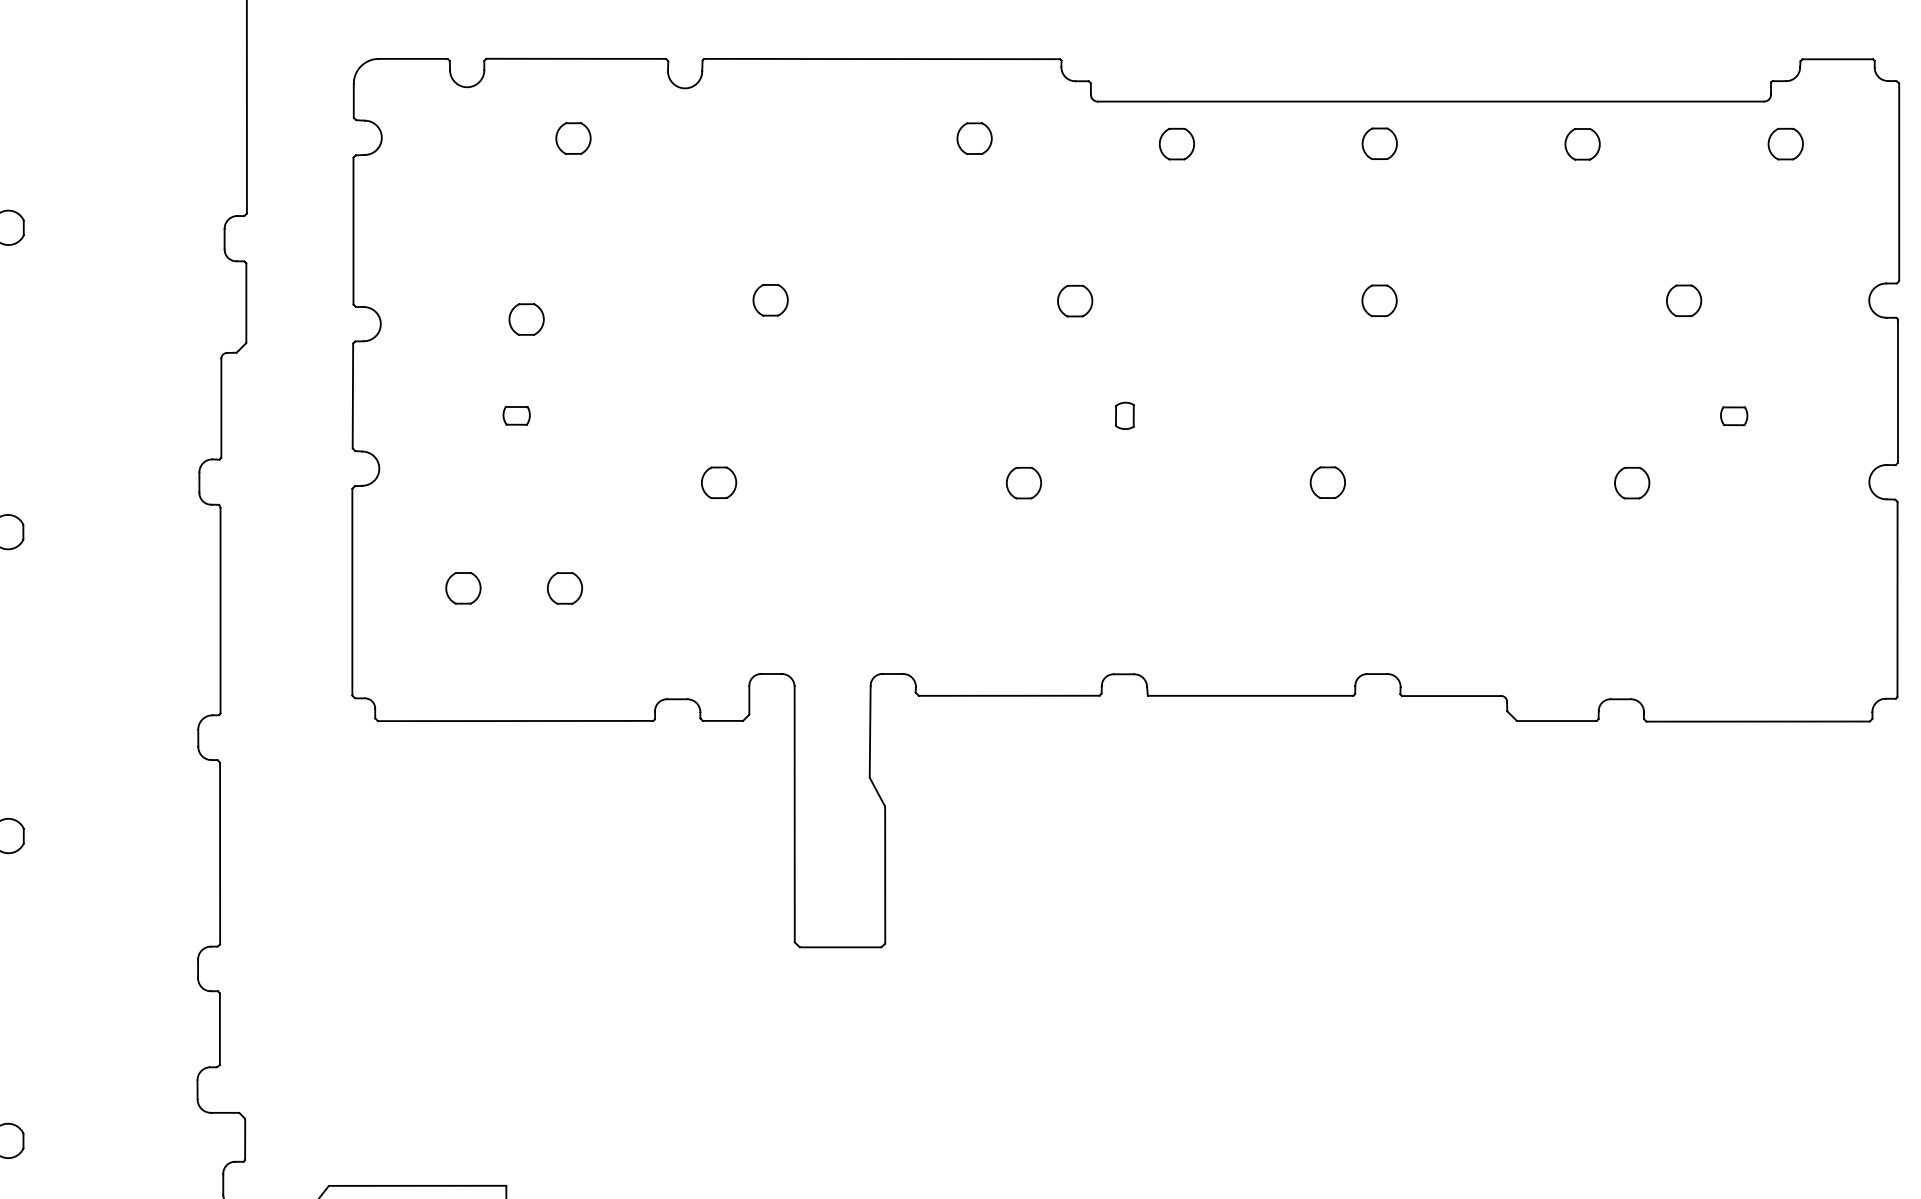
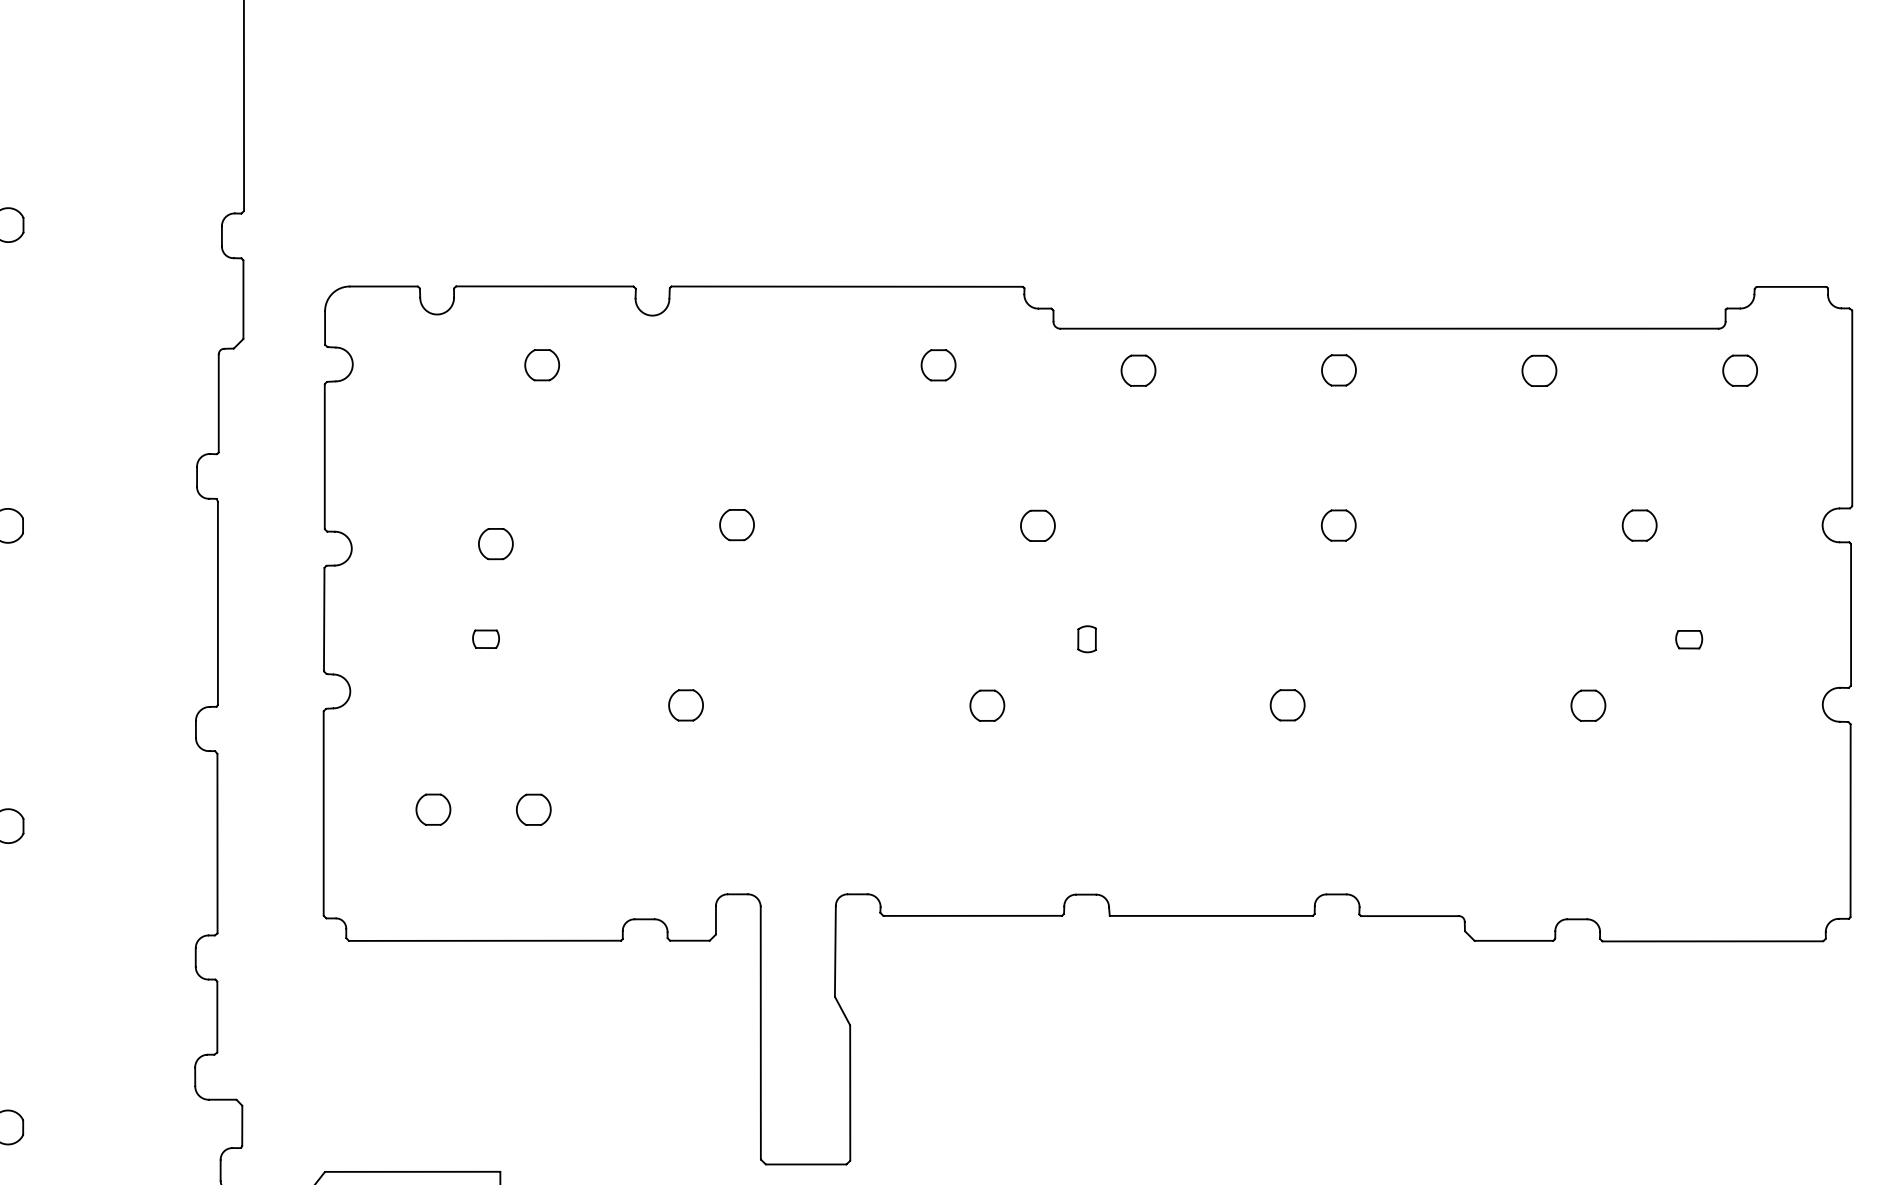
board edge: (566, 123) (581, 123) (588, 130) (590, 142) (587, 148) (580, 153) (565, 153) (558, 146) (556, 134) (559, 128) (566, 123) -> (534, 350) (549, 350) (557, 357) (558, 369) (555, 375) (549, 380) (534, 380) (527, 373) (525, 365) (526, 359) (534, 350)
board edge: (967, 123) (982, 123) (989, 130) (991, 138) (990, 144) (982, 153) (967, 153) (959, 146) (957, 134) (960, 128) (967, 123) -> (931, 350) (946, 350) (953, 357) (955, 369) (952, 375) (945, 380) (931, 380) (923, 373) (921, 365) (922, 359) (931, 350)
board edge: (1169, 128) (1184, 128) (1192, 136) (1193, 148) (1190, 154) (1184, 159) (1169, 159) (1161, 152) (1160, 139) (1163, 134) (1169, 128) -> (1131, 355) (1146, 355) (1153, 362) (1155, 368) (1154, 376) (1145, 385) (1131, 385) (1123, 378) (1122, 366) (1124, 360) (1131, 355)
board edge: (1372, 128) (1387, 128) (1394, 135) (1396, 148) (1393, 153) (1387, 159) (1372, 159) (1364, 151) (1362, 145) (1363, 137) (1372, 128) -> (1331, 355) (1346, 355) (1353, 362) (1355, 374) (1352, 380) (1346, 385) (1331, 385) (1324, 378) (1322, 366) (1325, 360) (1331, 355)
board edge: (1778, 128) (1793, 128) (1800, 136) (1802, 144) (1801, 150) (1793, 159) (1778, 159) (1770, 152) (1769, 139) (1771, 134) (1778, 128) -> (1732, 355) (1747, 355) (1755, 362) (1757, 370) (1755, 376) (1747, 385) (1732, 385) (1725, 378) (1723, 366) (1726, 360) (1732, 355)
board edge: (1575, 129) (1590, 128) (1597, 136) (1599, 142) (1598, 150) (1590, 159) (1575, 159) (1567, 152) (1565, 146) (1566, 138) (1575, 129) -> (1532, 355) (1546, 355) (1554, 362) (1556, 368) (1555, 377) (1546, 386) (1531, 386) (1524, 378) (1522, 370) (1523, 364) (1532, 355)
board edge: (763, 285) (778, 284) (785, 292) (787, 298) (786, 306) (778, 315) (763, 315) (755, 308) (753, 302) (754, 294) (763, 285) -> (729, 509) (744, 509) (752, 517) (753, 529) (750, 534) (744, 540) (729, 540) (722, 533) (720, 525) (721, 518) (729, 509)
board edge: (1067, 285) (1082, 285) (1090, 293) (1091, 305) (1089, 311) (1082, 316) (1067, 316) (1060, 309) (1058, 303) (1059, 294) (1067, 285) -> (1030, 510) (1045, 510) (1052, 517) (1054, 530) (1051, 535) (1045, 541) (1030, 541) (1022, 533) (1020, 525) (1022, 519) (1030, 510)
board edge: (1372, 285) (1387, 285) (1394, 292) (1396, 305) (1393, 310) (1386, 316) (1372, 316) (1364, 308) (1362, 296) (1365, 290) (1372, 285) -> (1331, 510) (1346, 510) (1353, 517) (1355, 525) (1354, 531) (1346, 540) (1331, 540) (1323, 533) (1322, 521) (1325, 515) (1331, 510)
board edge: (1676, 285) (1691, 285) (1699, 292) (1701, 300) (1700, 307) (1691, 316) (1676, 316) (1668, 308) (1666, 300) (1668, 294) (1676, 285) -> (1632, 510) (1647, 510) (1654, 517) (1656, 529) (1653, 535) (1647, 540) (1632, 540) (1624, 533) (1623, 521) (1625, 515) (1632, 510)
board edge: (519, 304) (534, 304) (541, 311) (543, 319) (542, 325) (534, 334) (519, 334) (511, 327) (510, 315) (512, 309) (519, 304) -> (488, 528) (503, 528) (510, 536) (512, 544) (511, 550) (503, 559) (488, 559) (480, 552) (479, 539) (482, 534) (488, 528)
board edge: none -> (1841, 308) (1830, 303) (1826, 286) (1756, 286) (1753, 299) (1749, 305) (1743, 308) (1725, 309) (1725, 324) (1719, 328) (1060, 328) (1054, 324) (1053, 310) (1051, 308) (1035, 308) (1028, 304) (1025, 299) (1023, 286) (671, 286) (666, 308) (660, 313) (652, 315) (644, 313) (638, 308) (635, 300) (635, 288) (633, 286) (456, 286) (454, 288) (453, 299) (450, 307) (445, 312) (437, 314) (428, 312) (423, 307) (417, 286) (349, 286) (336, 290) (328, 298) (325, 305) (325, 344) (346, 351) (350, 356) (352, 364) (350, 372) (346, 377) (340, 380) (326, 381) (324, 384) (324, 529) (327, 531) (337, 531) (345, 535) (350, 542) (351, 548) (350, 555) (345, 562) (324, 567) (323, 671) (326, 674) (343, 677) (348, 683) (350, 691) (348, 699) (343, 705) (326, 708) (323, 711) (323, 915) (326, 918) (338, 918) (343, 921) (346, 926) (346, 938) (349, 940) (621, 940) (624, 924) (634, 919) (661, 921) (666, 926) (667, 938) (670, 940) (709, 940) (715, 934) (715, 906)
board edge: none -> (1841, 308) (1849, 308) (1852, 310) (1852, 506) (1850, 508) (1831, 510) (1824, 516) (1822, 525) (1824, 533) (1831, 540) (1851, 543) (1851, 685) (1848, 687) (1837, 687) (1829, 691) (1825, 696) (1822, 704) (1825, 713) (1829, 718) (1837, 721) (1848, 721) (1850, 724) (1850, 917) (1830, 921) (1826, 927) (1825, 938) (1823, 941) (1602, 941) (1599, 938) (1598, 925) (1592, 920) (1587, 919) (1560, 921) (1555, 927) (1555, 938) (1553, 940) (1474, 940) (1464, 931) (1464, 920) (1460, 916) (1361, 916) (1357, 900) (1352, 895) (1346, 894) (1320, 896) (1315, 902) (1312, 915) (1109, 915) (1108, 903) (1103, 896) (1075, 894) (1066, 900) (1062, 915) (883, 915) (880, 912) (879, 901) (873, 895) (844, 894) (838, 898) (835, 904) (834, 996) (850, 1025) (850, 1160) (846, 1164) (765, 1164) (760, 1159) (760, 904) (757, 898) (751, 894) (727, 894) (719, 897) (715, 906)
board edge: (1116, 405) (1115, 426) (1124, 429) (1133, 426) (1133, 404) (1124, 402) (1116, 405) -> none
board edge: (506, 424) (503, 415) (505, 406) (527, 407) (529, 416) (526, 424) (506, 424) -> (476, 647) (473, 639) (475, 630) (496, 630) (499, 639) (496, 648) (476, 647)
board edge: (1724, 425) (1744, 425) (1747, 416) (1745, 407) (1723, 407) (1720, 416) (1724, 425) -> (1679, 648) (1699, 648) (1702, 639) (1699, 630) (1678, 630) (1676, 639) (1679, 648)
board edge: (711, 467) (726, 467) (734, 474) (736, 482) (735, 489) (726, 498) (711, 498) (703, 490) (702, 478) (705, 472) (711, 467) -> (678, 690) (693, 690) (701, 697) (703, 705) (701, 711) (693, 720) (678, 720) (671, 713) (669, 705) (670, 699) (678, 690)
board edge: (1016, 467) (1031, 467) (1039, 475) (1041, 483) (1039, 489) (1031, 498) (1016, 498) (1008, 491) (1007, 478) (1010, 473) (1016, 467) -> (980, 690) (994, 690) (1002, 697) (1004, 703) (1003, 711) (994, 720) (979, 720) (972, 713) (970, 701) (973, 695) (980, 690)
board edge: (1320, 467) (1335, 467) (1343, 474) (1344, 486) (1341, 492) (1335, 498) (1320, 498) (1312, 490) (1311, 478) (1313, 472) (1320, 467) -> (1280, 690) (1295, 690) (1302, 697) (1304, 703) (1303, 711) (1294, 720) (1280, 720) (1272, 713) (1271, 701) (1273, 695) (1280, 690)
board edge: (1624, 467) (1639, 467) (1647, 475) (1648, 487) (1646, 493) (1639, 498) (1624, 498) (1617, 491) (1615, 485) (1616, 476) (1624, 467) -> (1581, 690) (1595, 690) (1603, 697) (1605, 703) (1604, 711) (1595, 720) (1580, 720) (1573, 713) (1571, 701) (1574, 695) (1581, 690)
board edge: (456, 573) (471, 573) (478, 580) (480, 588) (479, 594) (470, 603) (455, 603) (448, 596) (446, 588) (447, 582) (456, 573) -> (426, 794) (440, 794) (448, 801) (449, 813) (447, 819) (440, 824) (425, 824) (418, 817) (416, 805) (419, 799) (426, 794)
board edge: (557, 573) (572, 573) (580, 580) (581, 592) (578, 598) (572, 603) (557, 603) (549, 596) (548, 584) (551, 578) (557, 573) -> (526, 794) (541, 794) (548, 801) (550, 809) (549, 816) (541, 824) (526, 824) (518, 817) (517, 805) (520, 799) (526, 794)
board edge: none -> (1095, 628) (1095, 650) (1086, 652) (1078, 649) (1078, 629) (1087, 626) (1095, 628)
board edge: (749, 686) (752, 677) (761, 673) (784, 674) (791, 678) (794, 684) (794, 942) (799, 947) (881, 947) (885, 943) (885, 806) (869, 777) (870, 684) (873, 678) (879, 674) (908, 675) (914, 681) (915, 692) (918, 695) (1099, 695) (1103, 679) (1113, 674) (1135, 674) (1141, 676) (1146, 682) (1147, 695) (1353, 695) (1355, 682) (1360, 675) (1387, 674) (1393, 675) (1398, 680) (1402, 696) (1502, 696) (1506, 700) (1507, 711) (1516, 721) (1596, 721) (1598, 719) (1599, 707) (1604, 701) (1631, 699) (1636, 700) (1642, 705) (1643, 719) (1646, 721) (1869, 721) (1872, 718) (1873, 707) (1877, 701) (1897, 697) (1897, 501) (1895, 499) (1884, 499) (1876, 495) (1870, 488) (1869, 482) (1870, 475) (1876, 468) (1884, 465) (1895, 465) (1897, 462) (1897, 319) (1877, 315) (1871, 309) (1869, 300) (1871, 292) (1877, 285) (1896, 283) (1899, 281) (1899, 83) (1896, 81) (1884, 80) (1878, 77) (1875, 71) (1873, 59) (1802, 59) (1799, 71) (1794, 78) (1789, 80) (1771, 82) (1770, 96) (1764, 101) (1097, 101) (1091, 97) (1090, 83) (1088, 81) (1072, 80) (1065, 77) (1062, 71) (1060, 59) (704, 58) (699, 79) (693, 86) (685, 88) (676, 86) (670, 79) (668, 61) (665, 58) (486, 58) (484, 60) (484, 72) (480, 80) (475, 84) (467, 87) (458, 84) (453, 80) (447, 58) (378, 58) (365, 62) (357, 70) (354, 78) (353, 117) (374, 123) (379, 129) (381, 137) (379, 145) (374, 151) (355, 155) (353, 157) (353, 304) (355, 306) (365, 307) (373, 310) (378, 316) (380, 324) (378, 332) (373, 338) (365, 341) (355, 341) (353, 343) (352, 448) (355, 451) (371, 454) (377, 460) (379, 468) (377, 476) (371, 482) (354, 486) (352, 488) (352, 695) (355, 698) (367, 698) (372, 701) (374, 706) (375, 718) (378, 721) (653, 720) (656, 704) (666, 699) (688, 699) (694, 701) (699, 706) (700, 718) (702, 720) (743, 720) (749, 714) (749, 686) -> none

